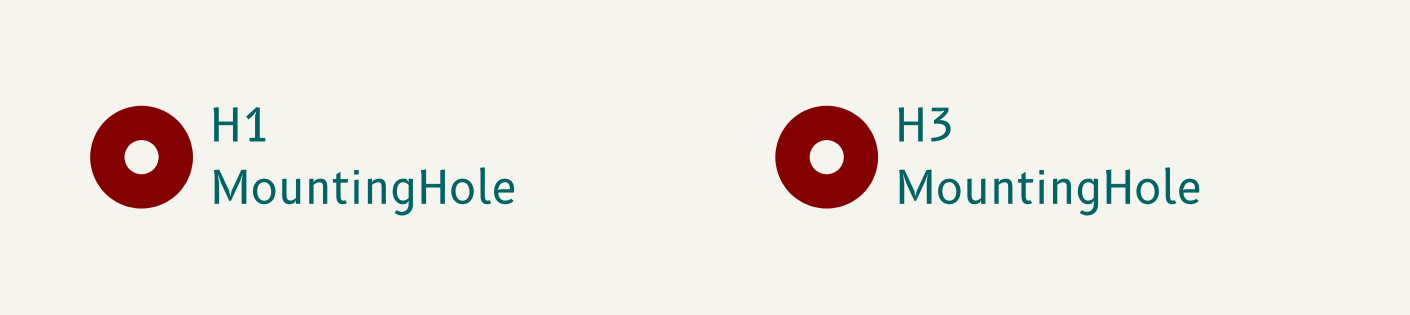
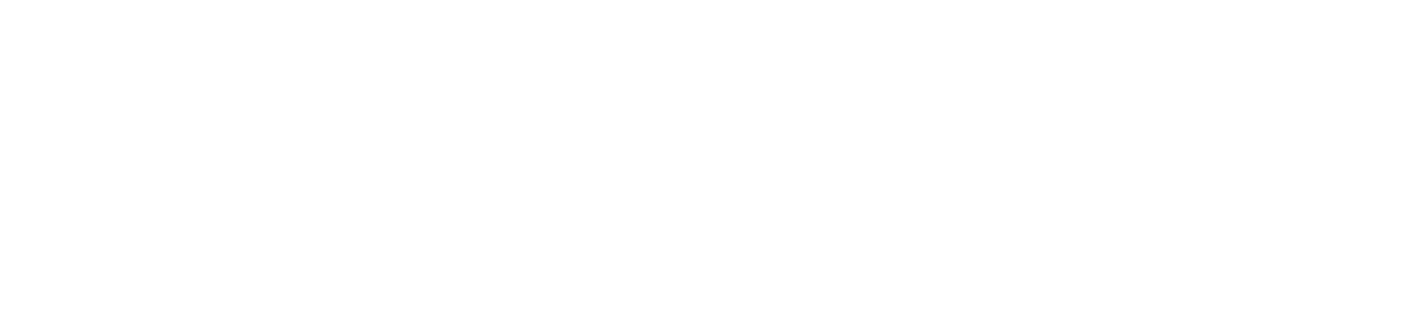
H1: MountingHole (141, 157) -> none
H3: MountingHole (826, 157) -> none

